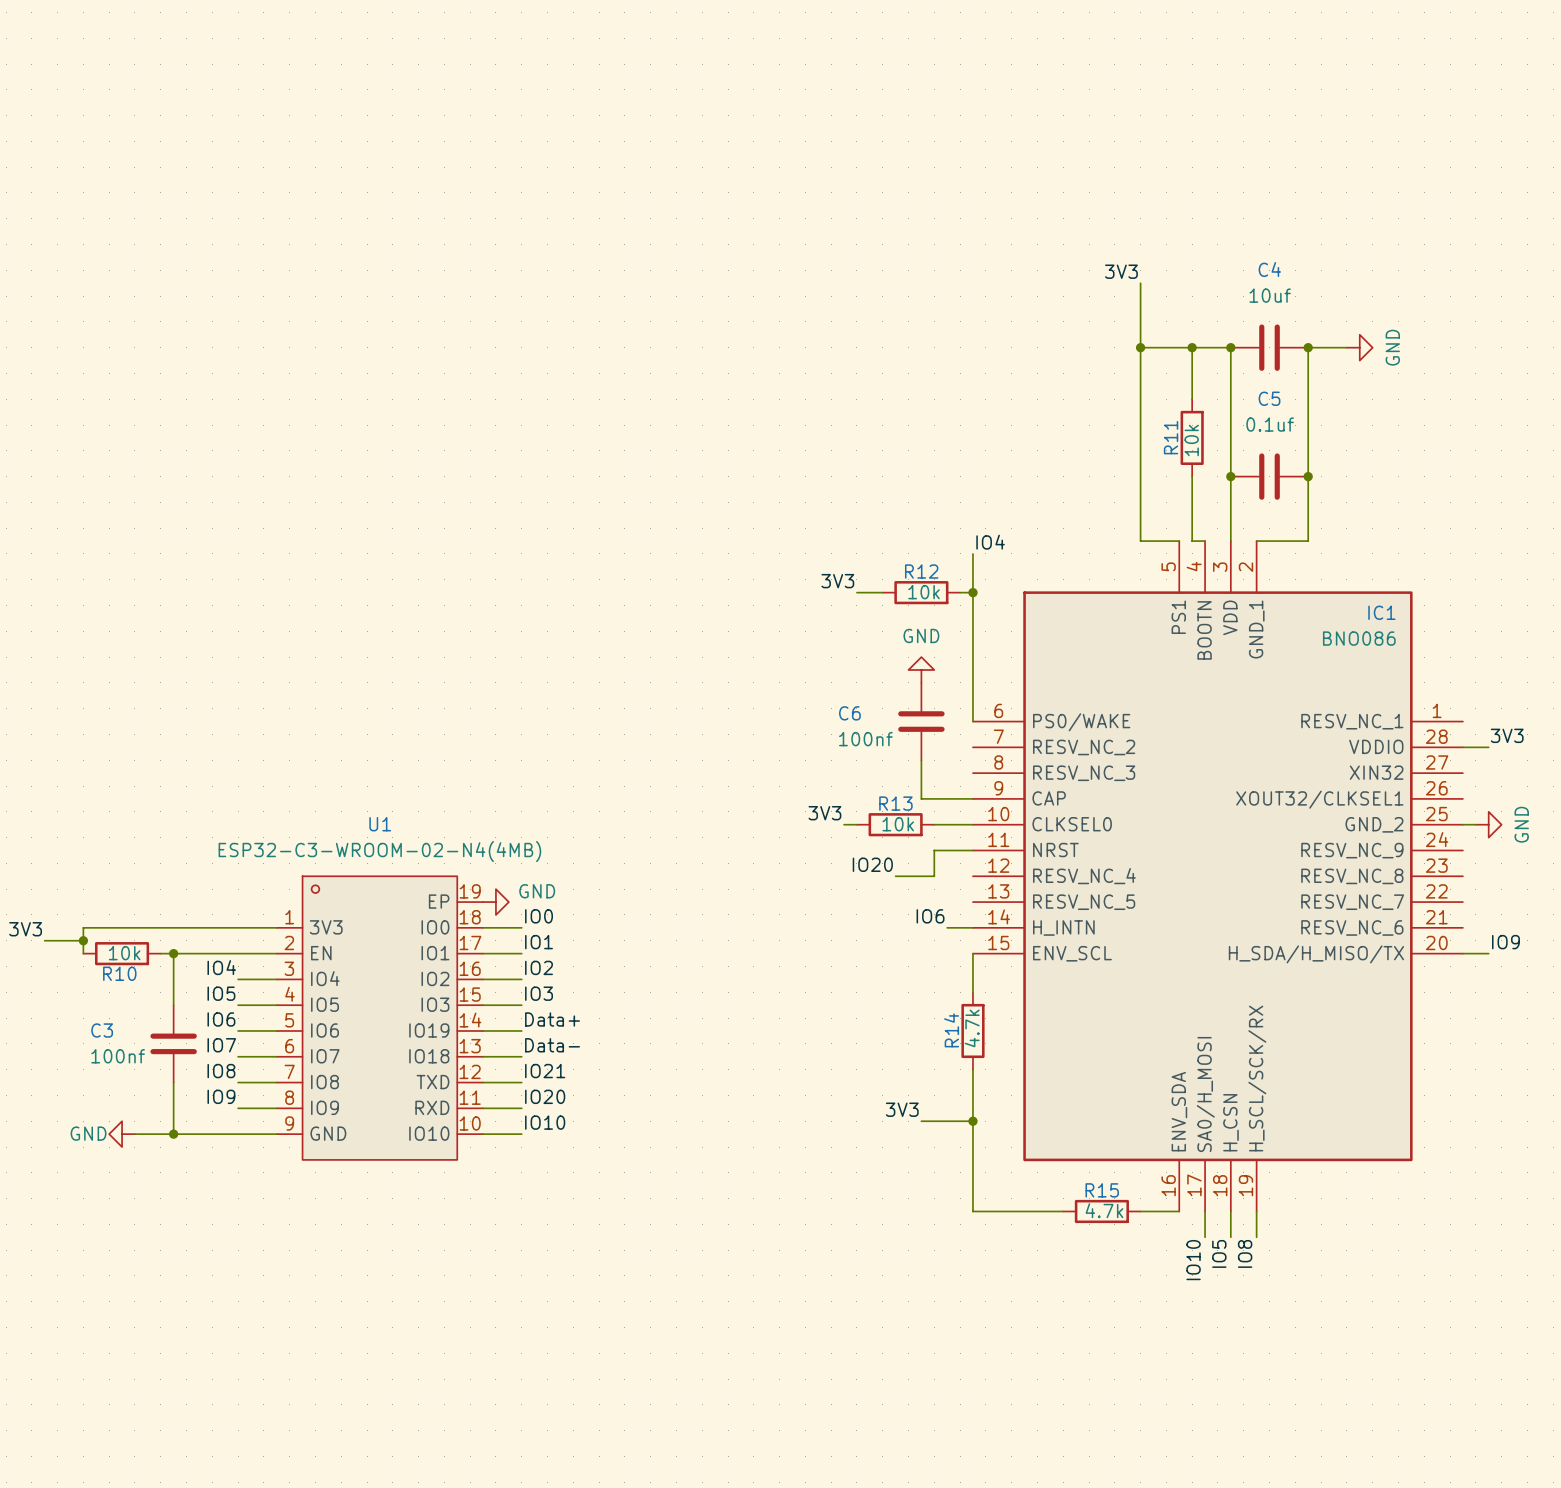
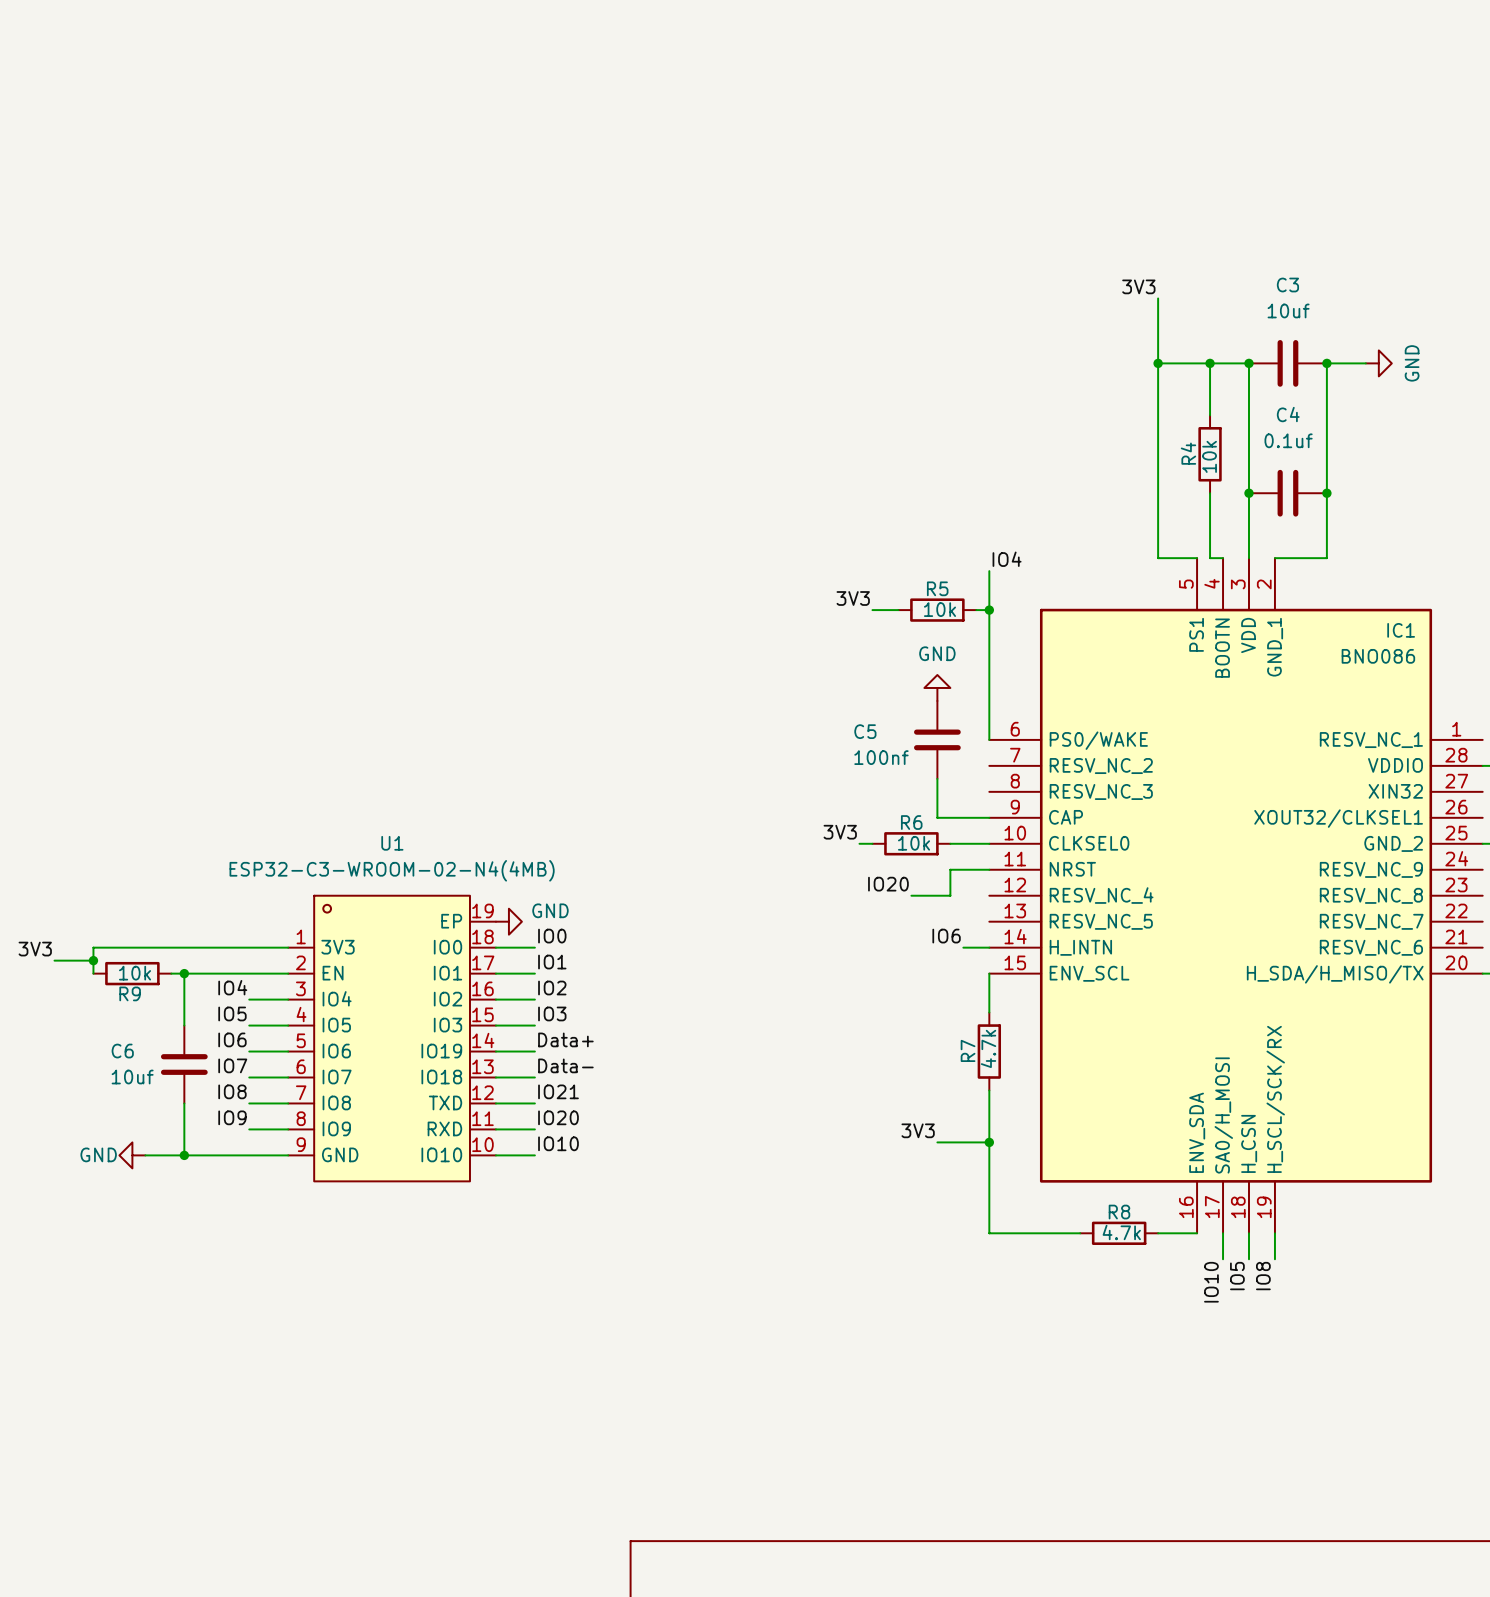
C4 name: C4 (1269, 269) -> C3 (1287, 285)
C5 name: C5 (1269, 398) -> C4 (1288, 414)
R11 name: R11 (1171, 437) -> R4 (1188, 453)
R12 name: R12 (921, 571) -> R5 (937, 588)
C6 name: C6 (849, 713) -> C5 (865, 731)
R13 name: R13 (895, 803) -> R6 (911, 822)
R10 name: R10 (119, 973) -> R9 (130, 993)
C3 name: C3 (102, 1030) -> C6 (122, 1051)
R14 name: R14 (951, 1030) -> R7 (968, 1050)
C3 value: 100nf (118, 1056) -> 10uf (132, 1077)
R15 name: R15 (1102, 1190) -> R8 (1119, 1212)

